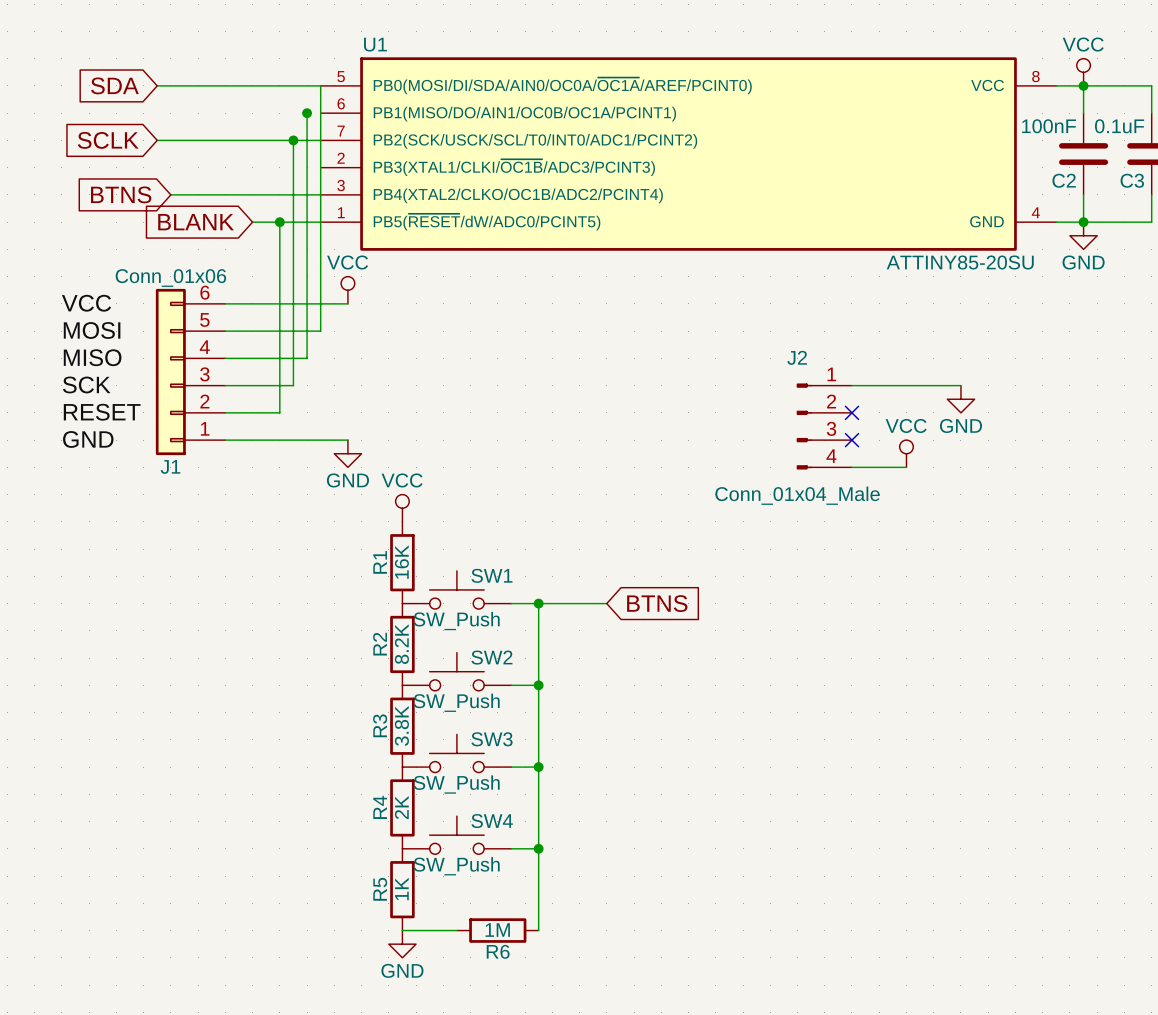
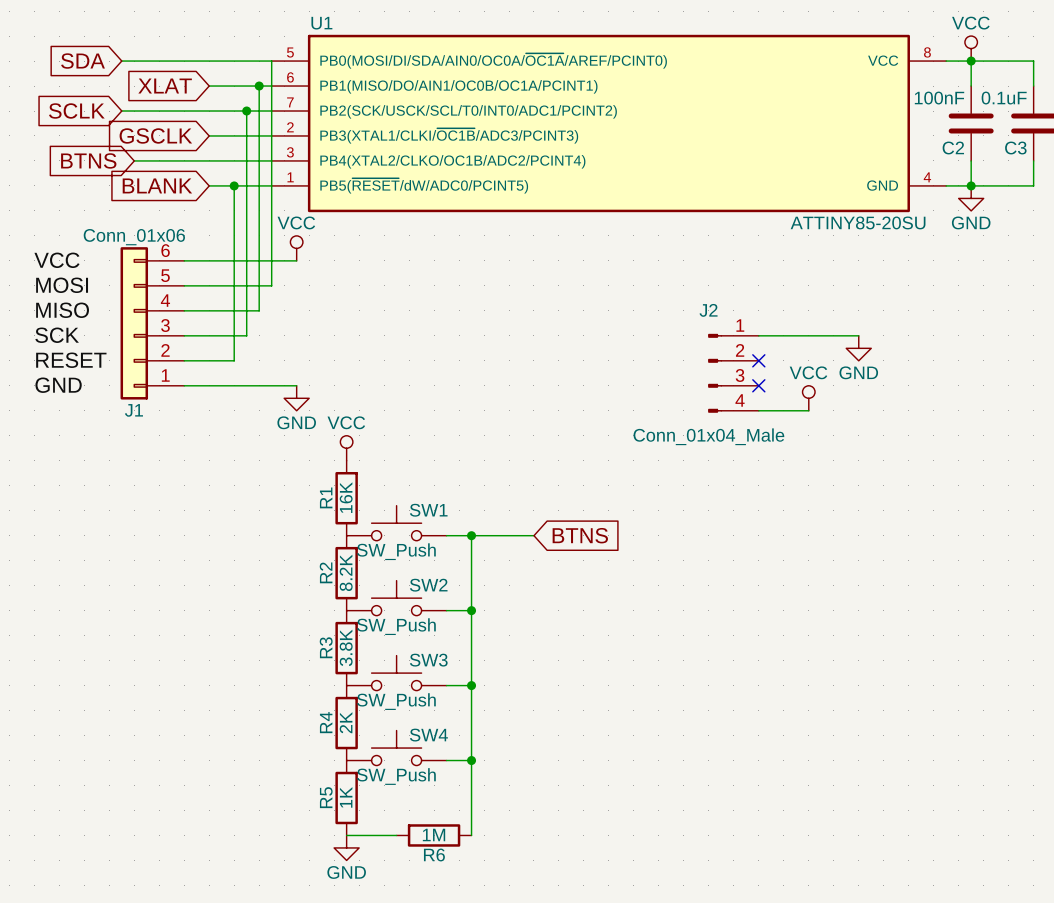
global label: none -> XLAT (165, 86)
wire: none -> (209, 86) (271, 86)
global label: none -> GSCLK (155, 135)
wire: none -> (209, 135) (271, 135)

